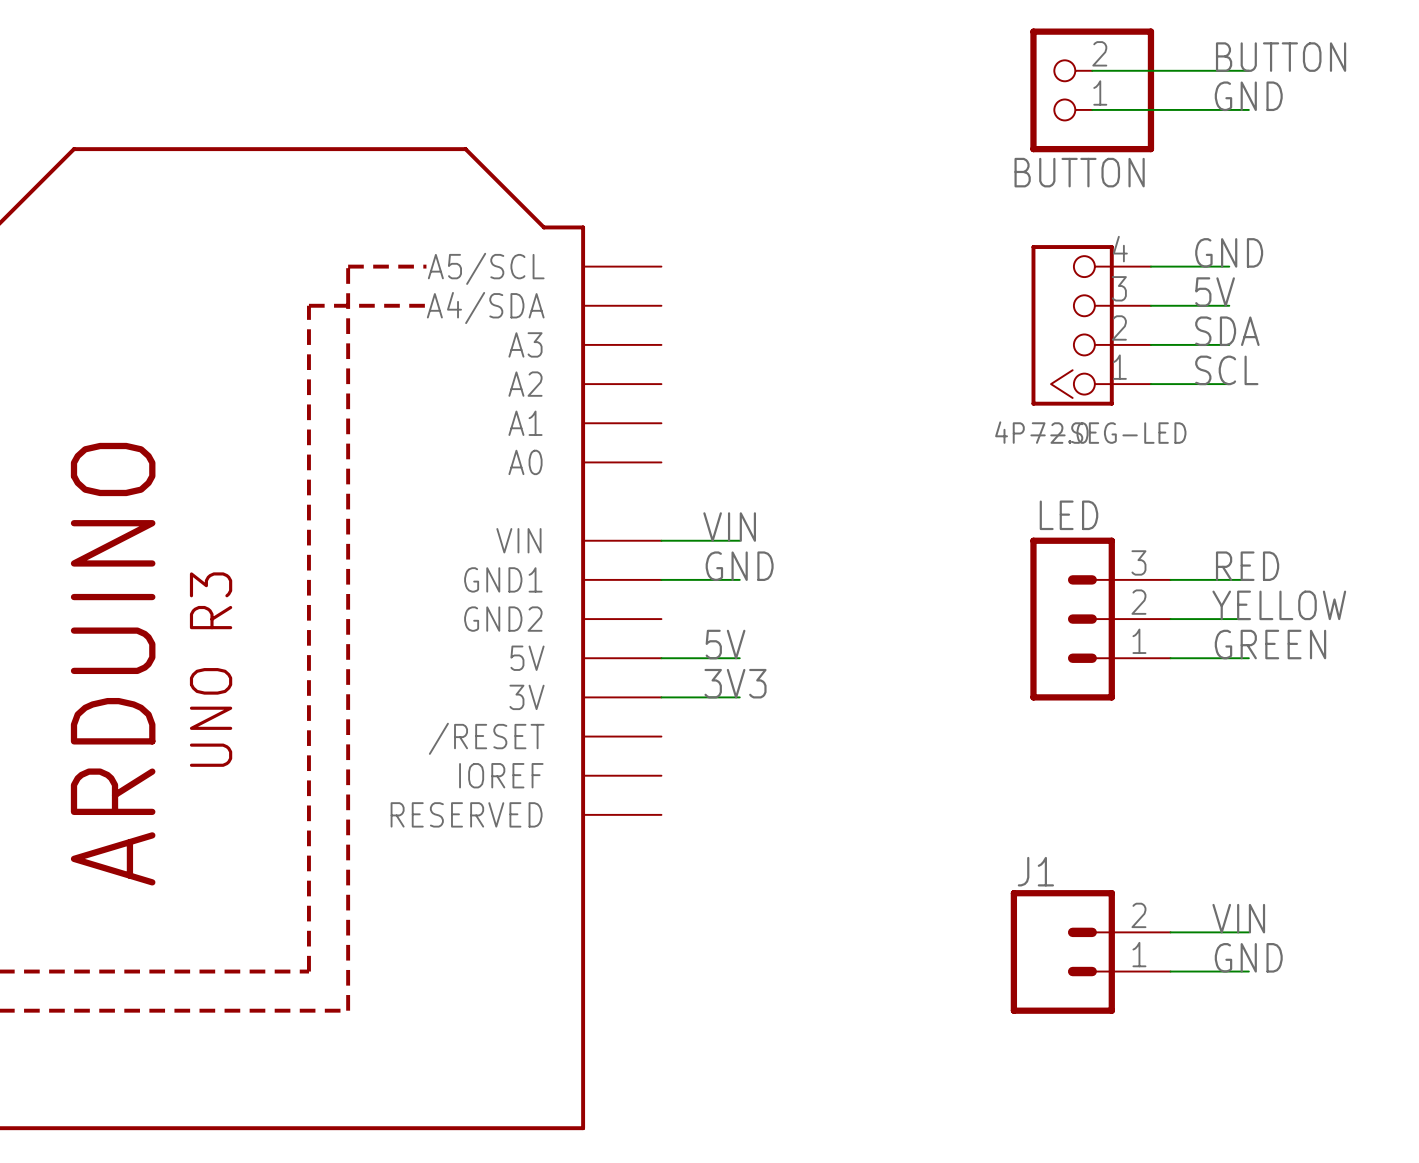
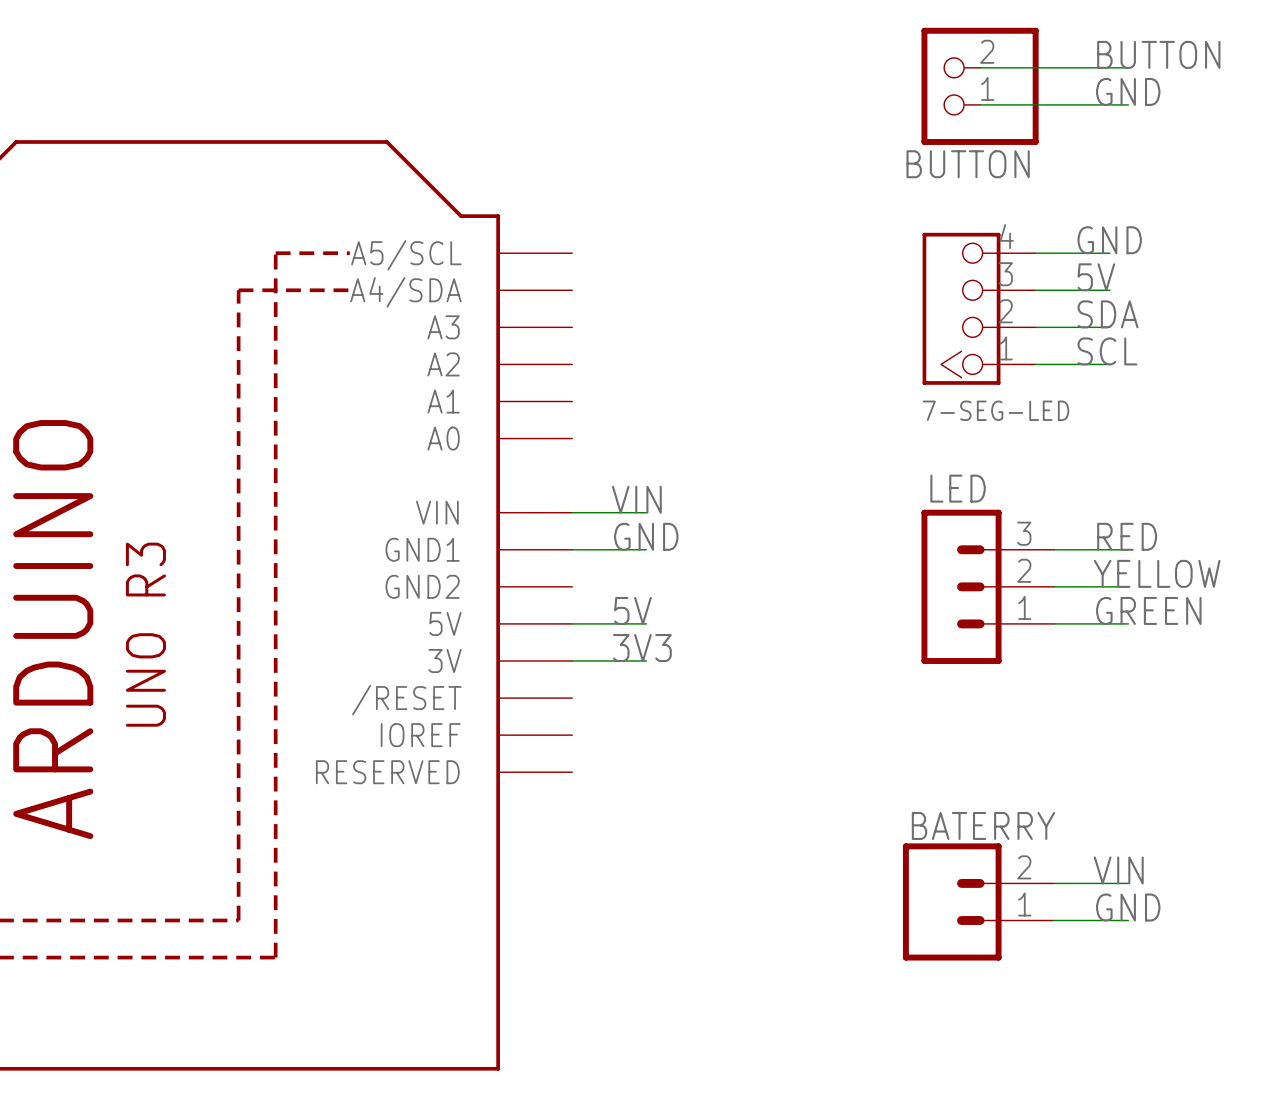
7-SEG-LED value: 4P-2.0 (1041, 432) -> none
J1 name: J1 (1035, 871) -> BATERRY (983, 825)

